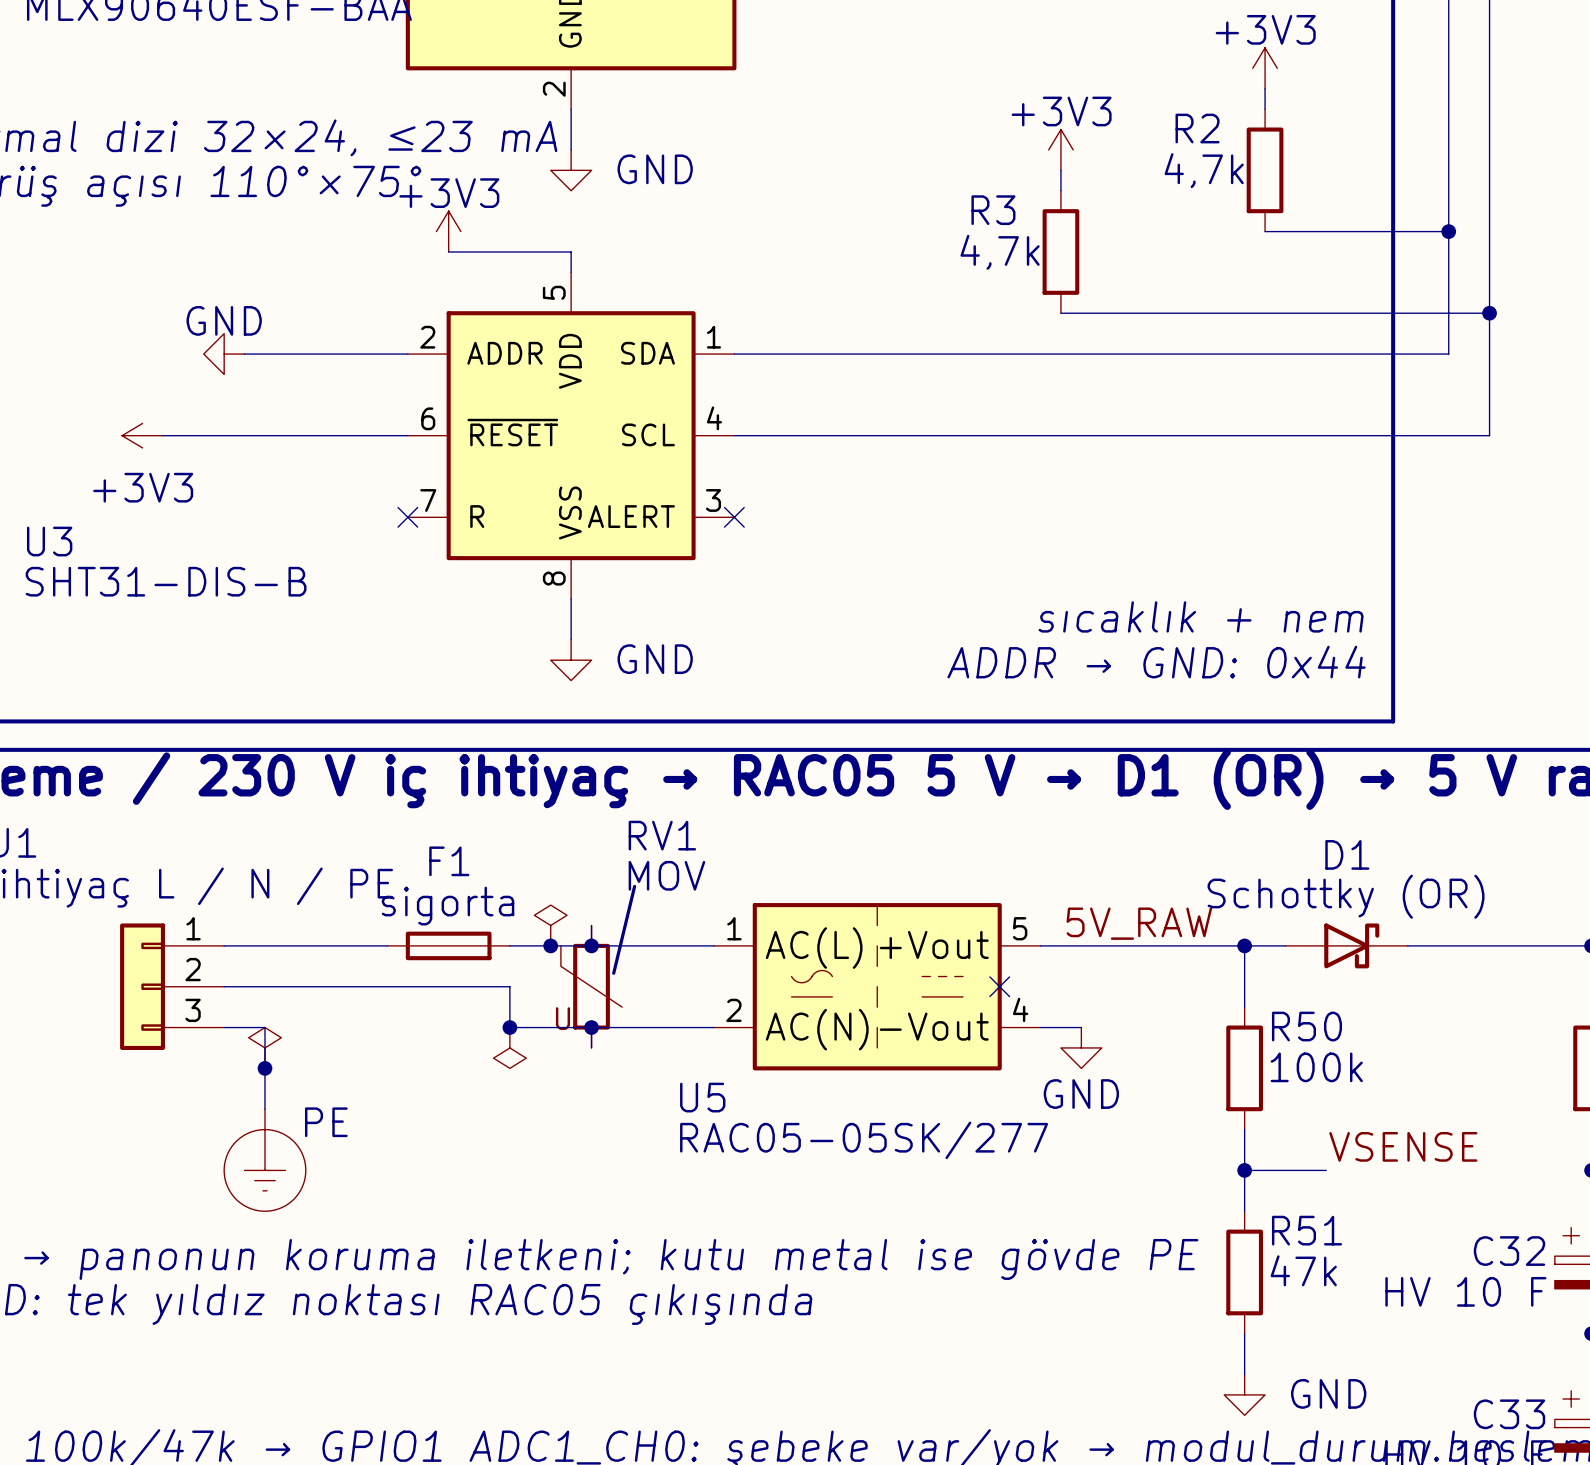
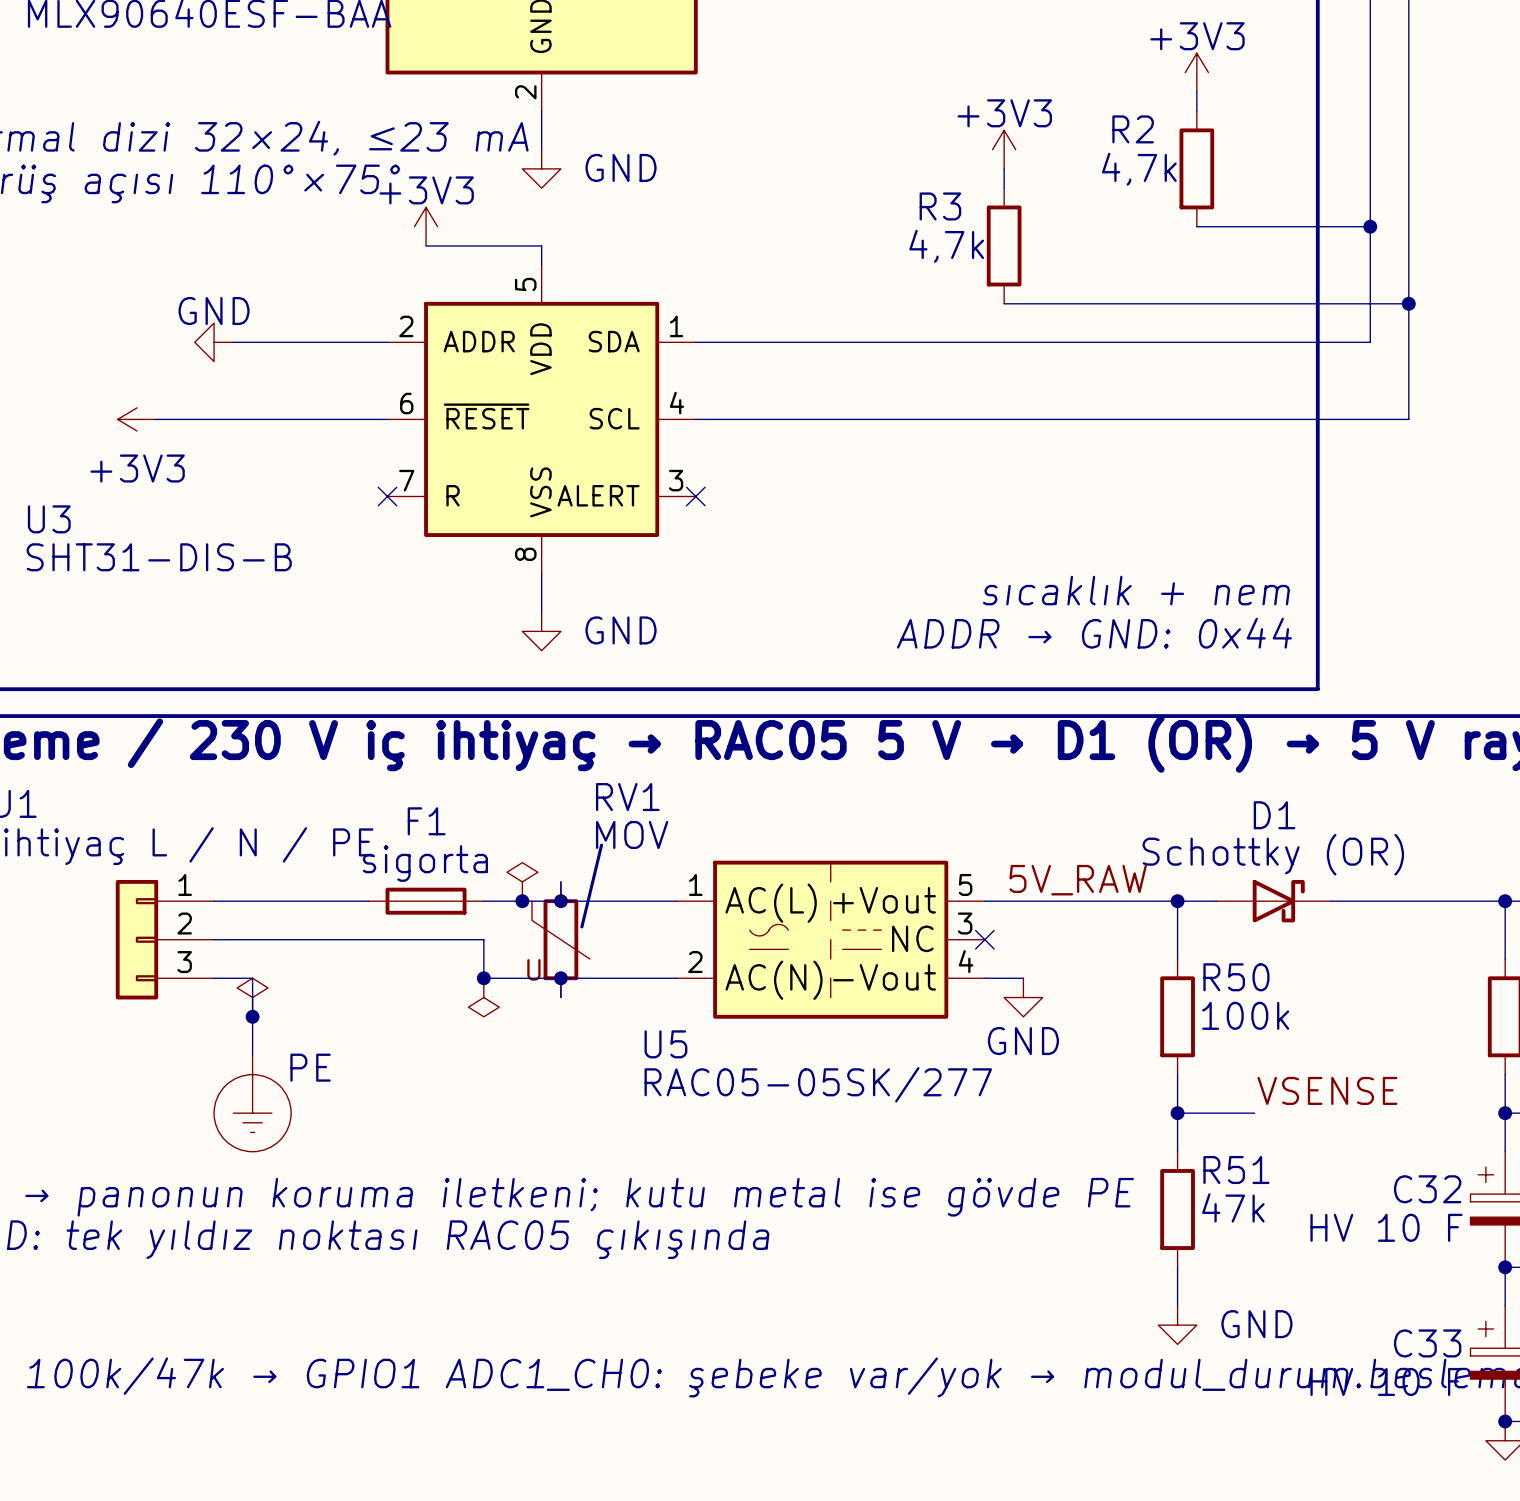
U5 symbol: [713, 903, 1041, 1071] -> [676, 860, 985, 1019]
no-connect mark position: (999, 986) -> (984, 939)

